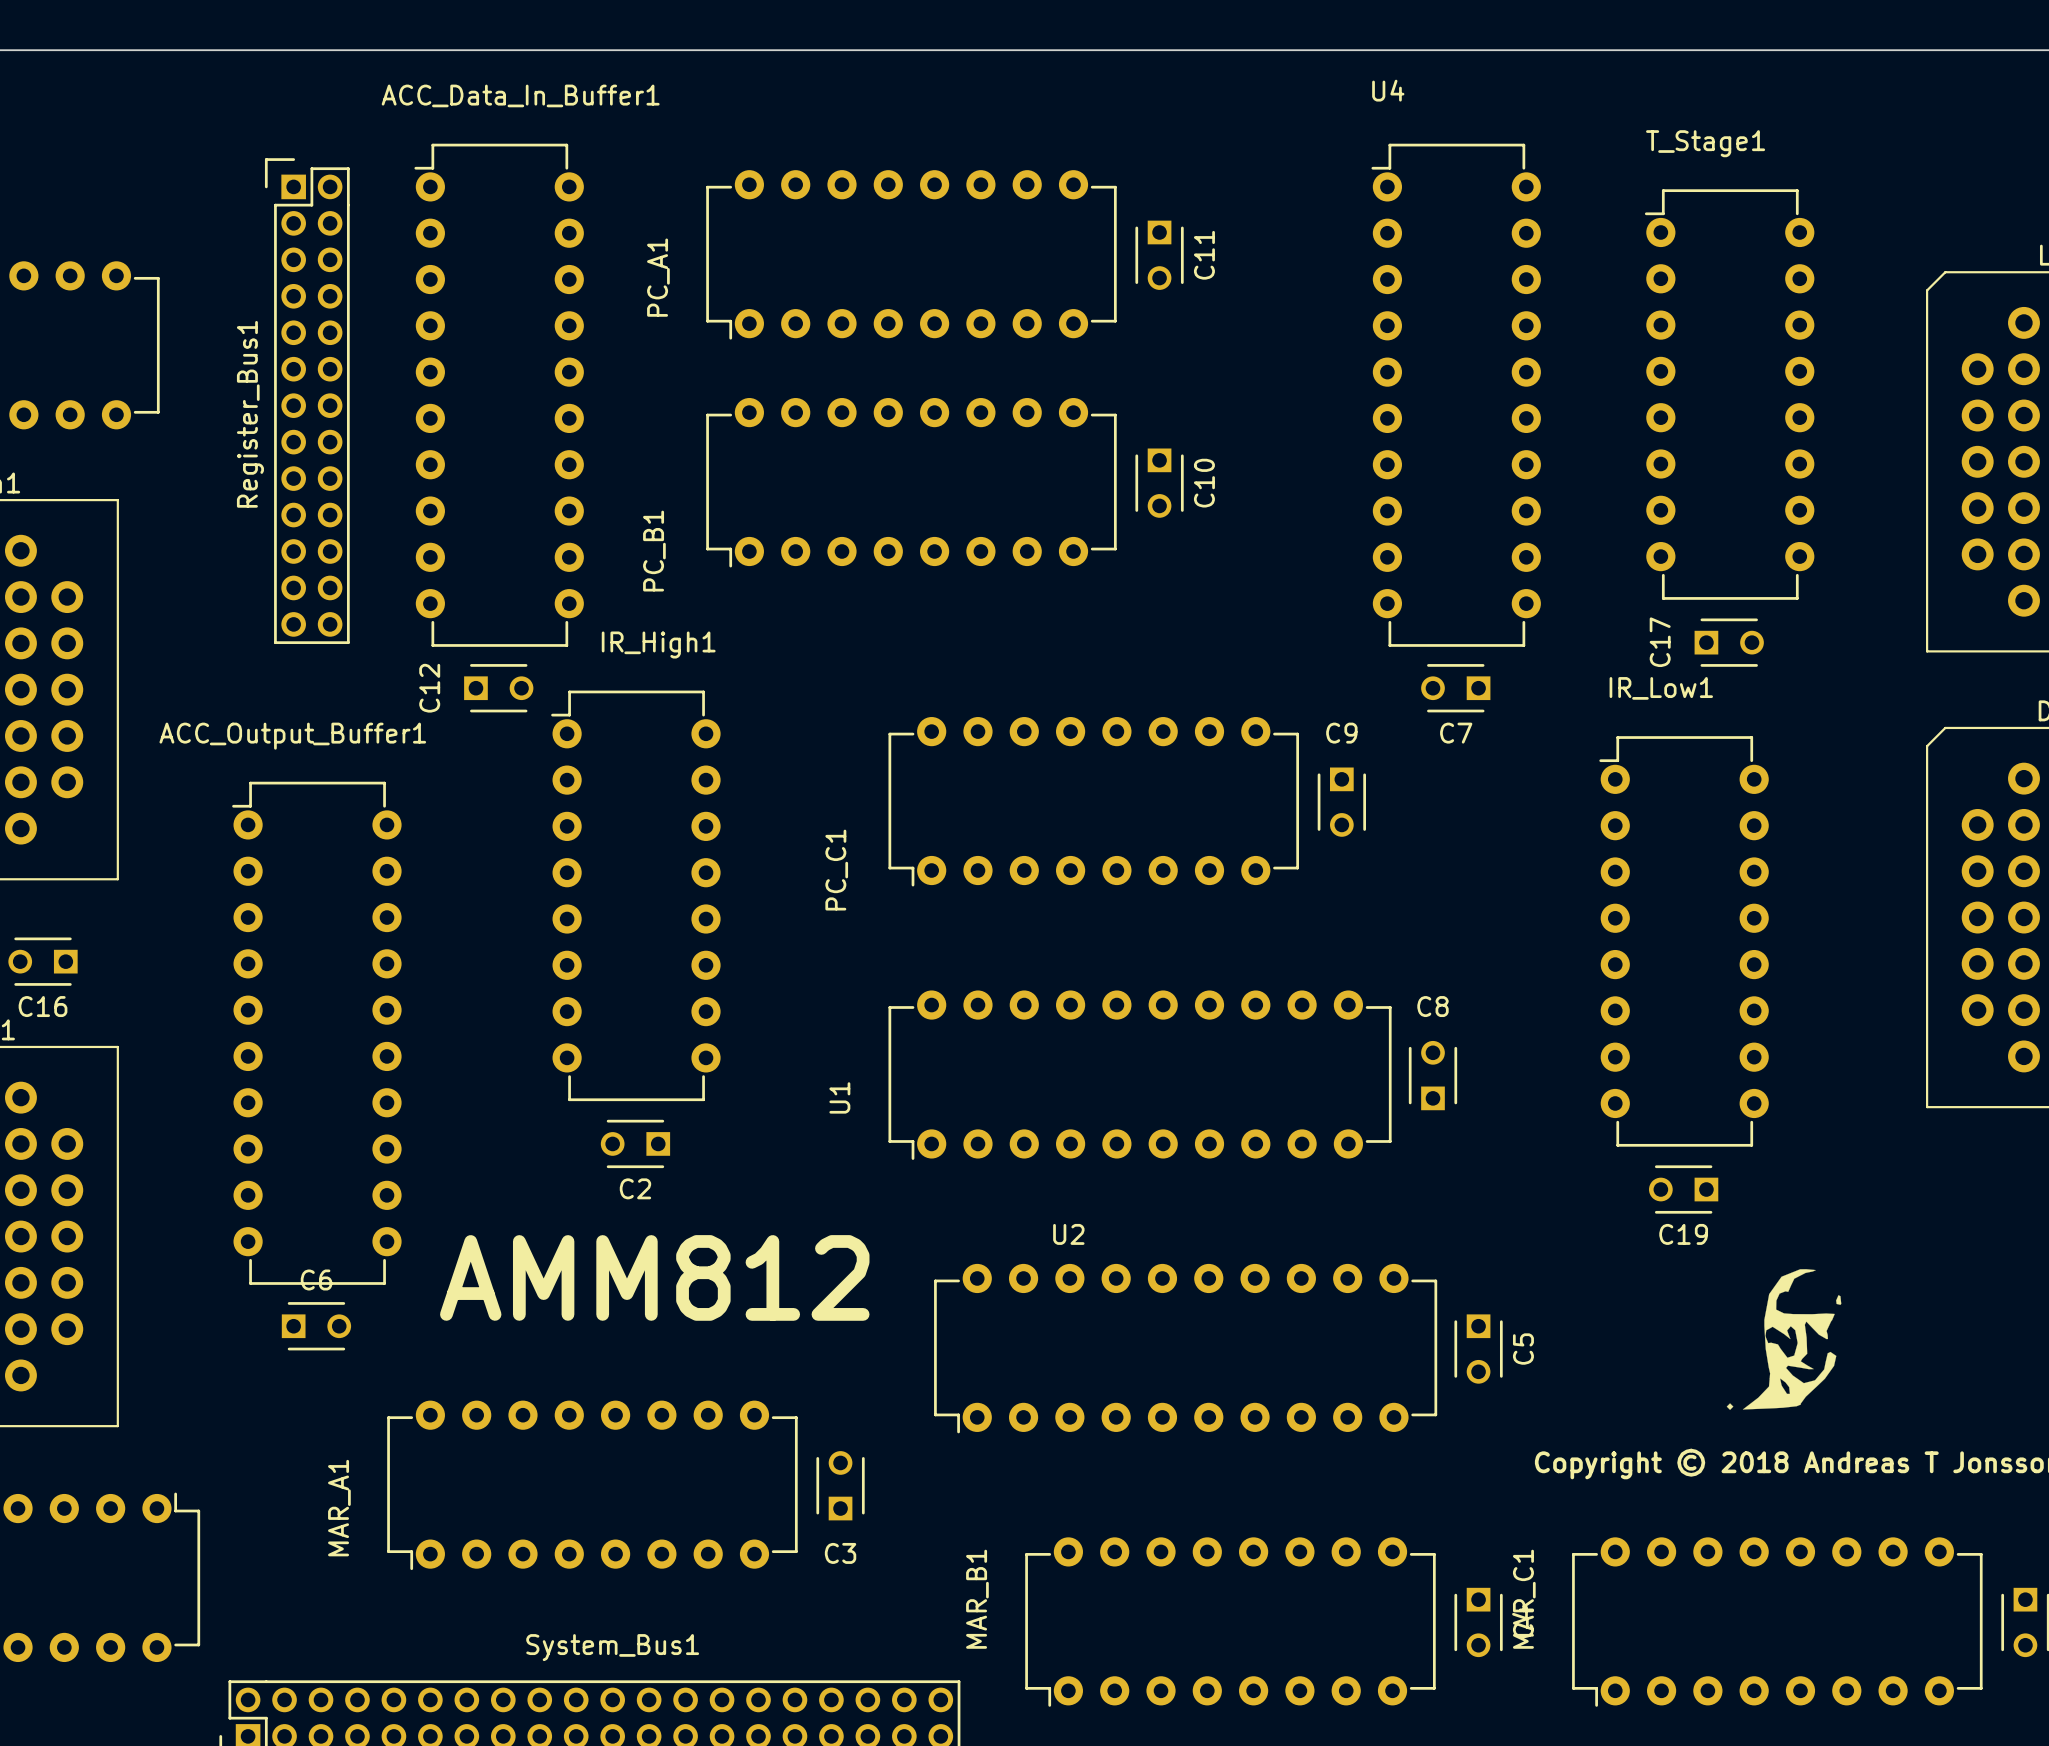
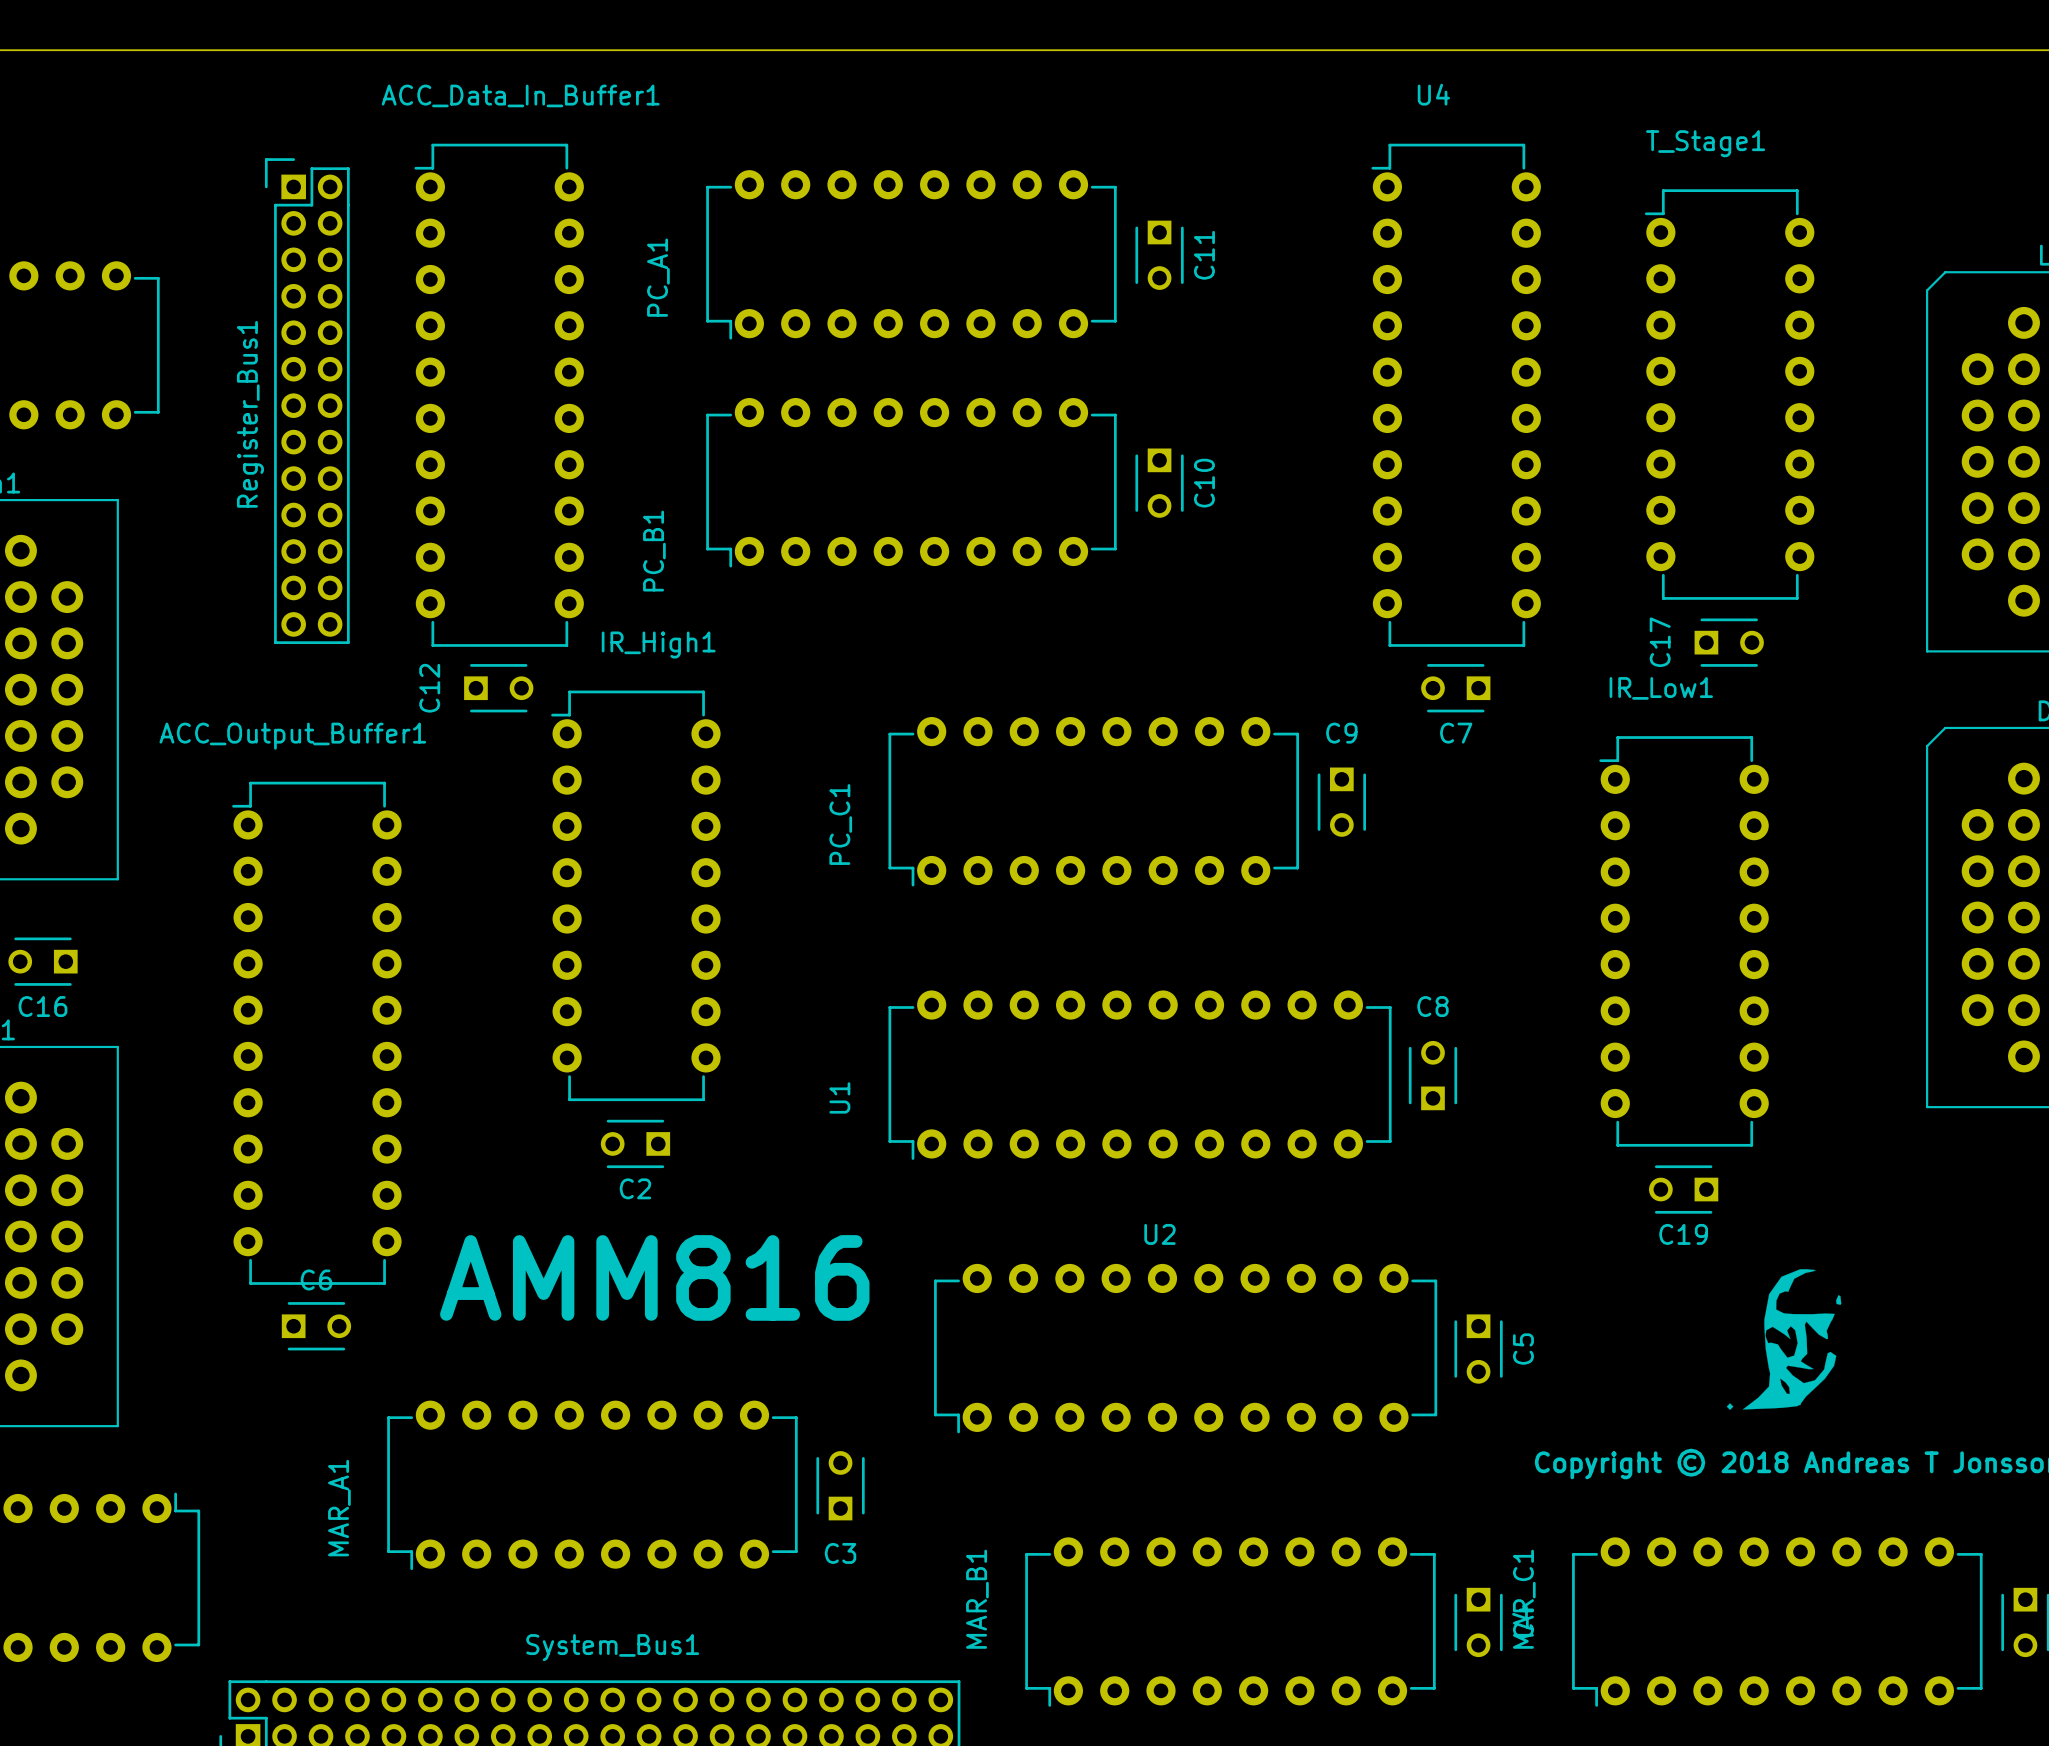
U4 name position: U4 (1388, 90) -> U4 (1433, 94)
PC_C1 name position: PC_C1 (836, 870) -> PC_C1 (840, 824)
U2 name position: U2 (1068, 1234) -> U2 (1159, 1234)
text: AMM812 (654, 1277) -> AMM816 (654, 1277)

